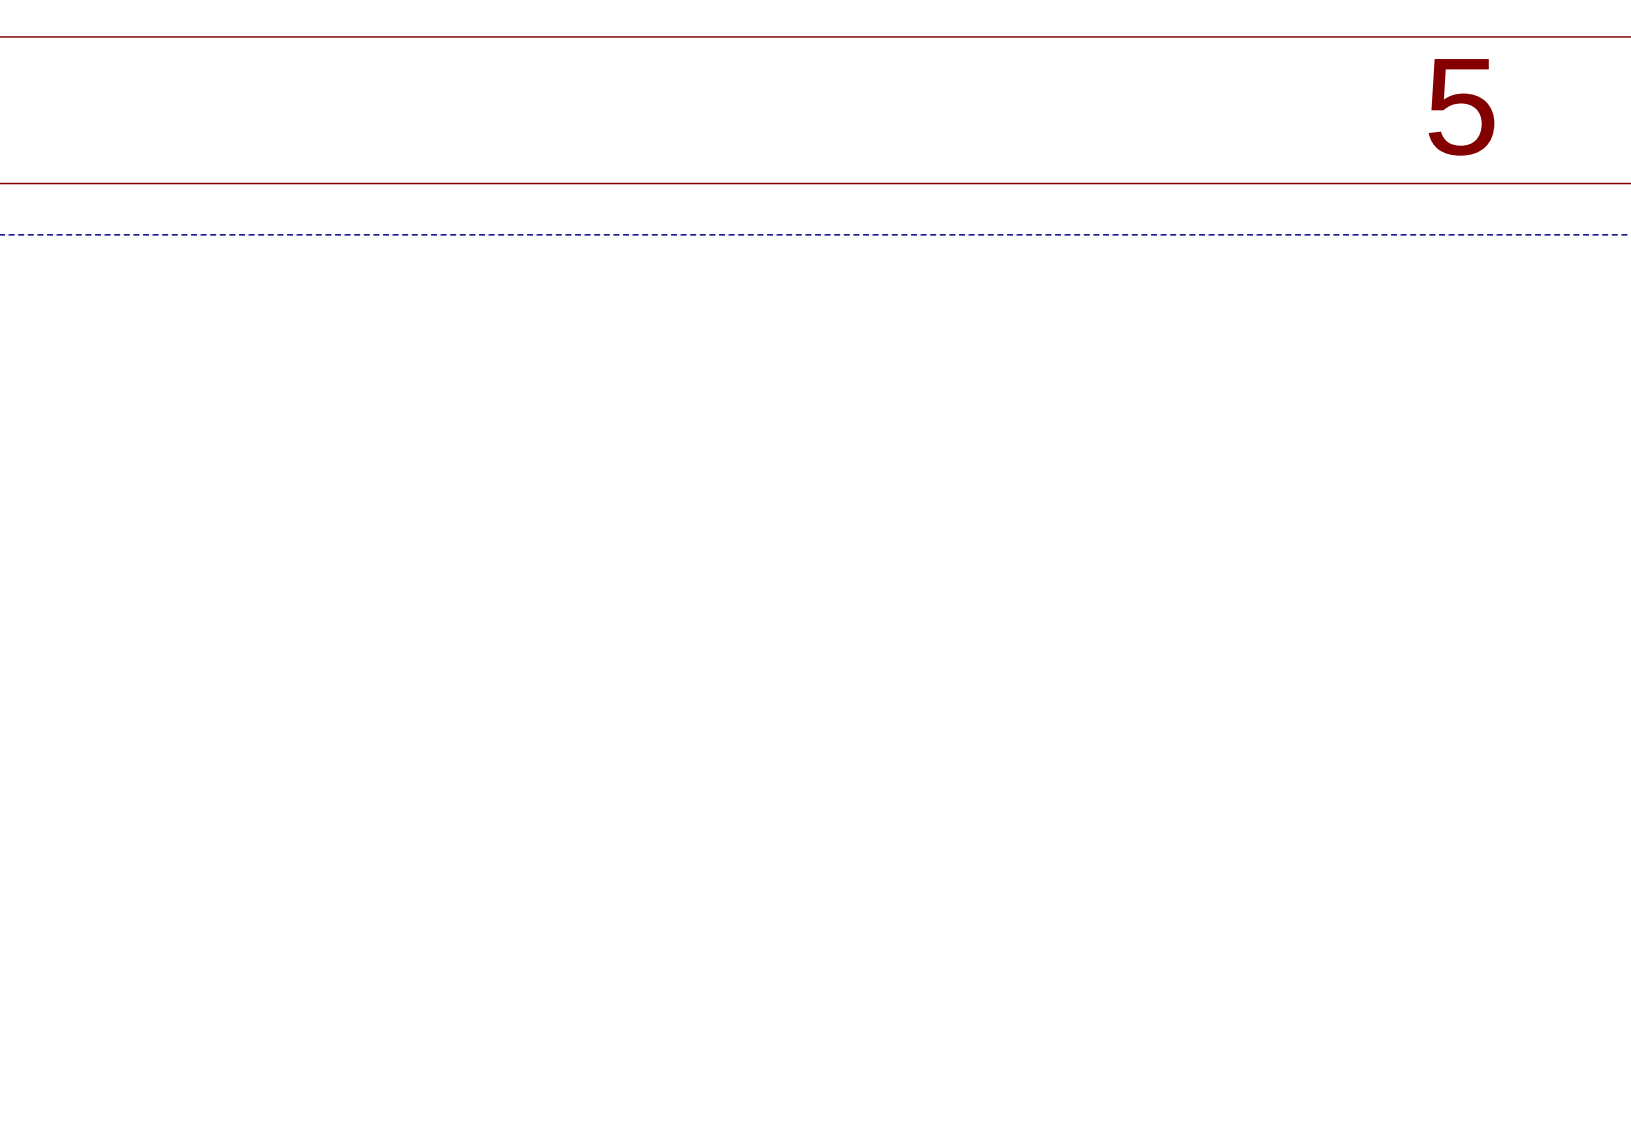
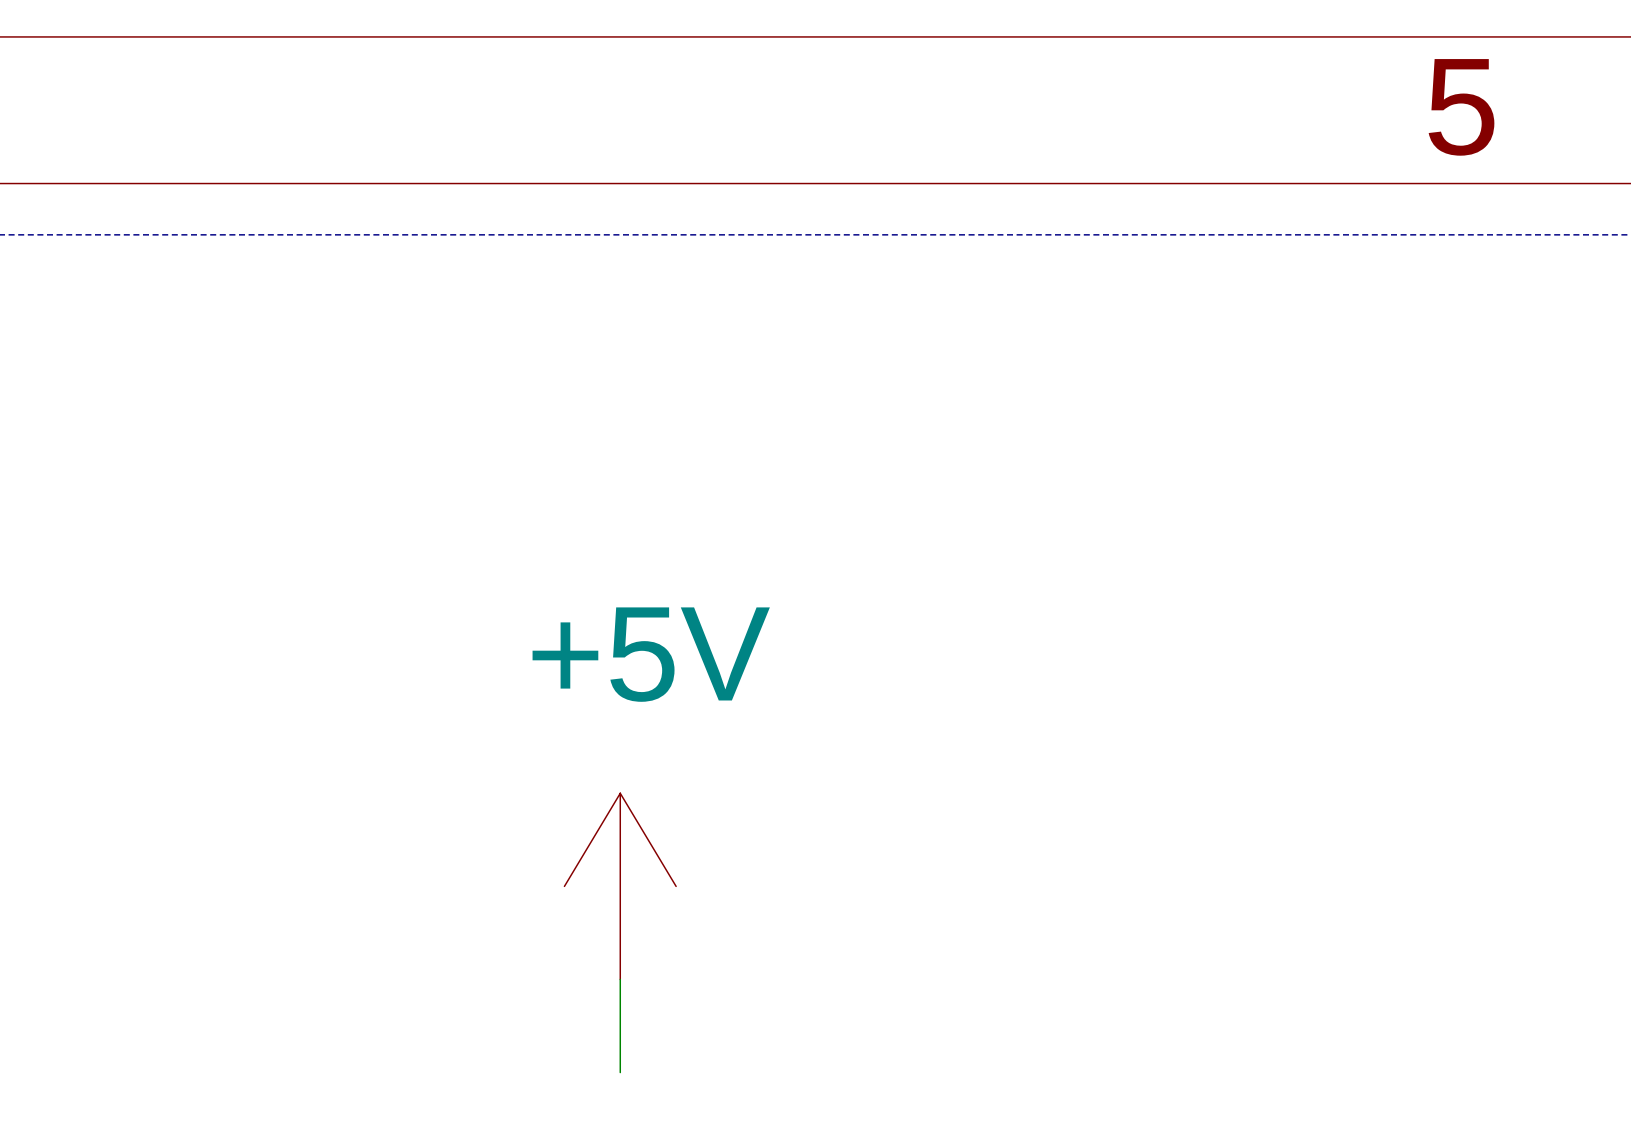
power symbol: none -> +5V (620, 886)
wire: none -> (620, 979) (620, 1072)

